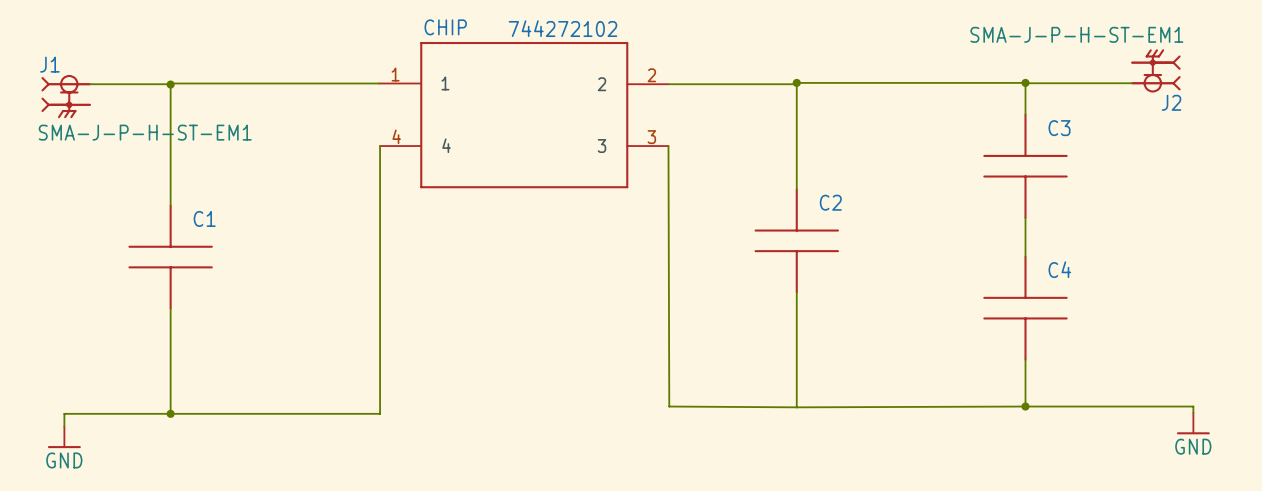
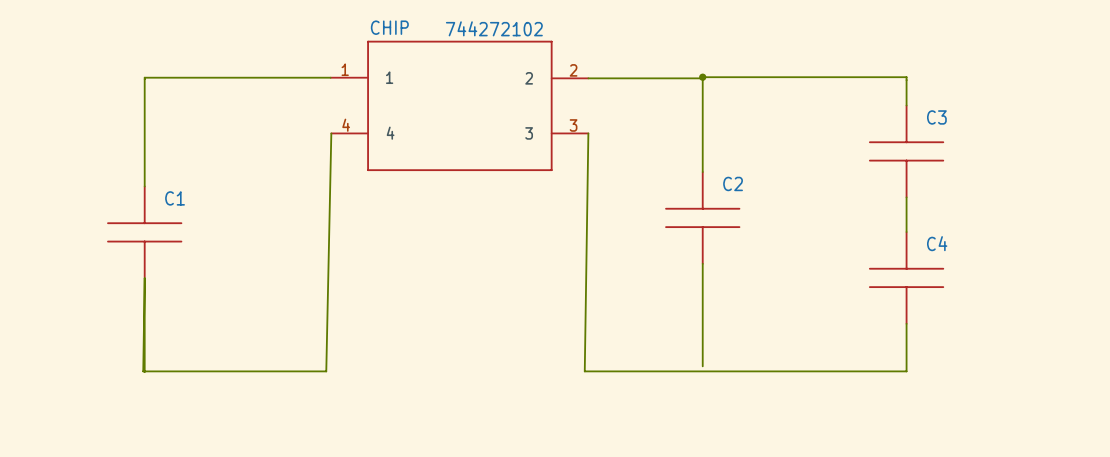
J2: SMA-J-P-H-ST-EM1 (1155, 70) -> none
wire: (1025, 82) (1132, 83) -> none
junction: (1025, 82) -> none
wire: (89, 84) (170, 84) -> none
junction: (170, 84) -> none
J1: SMA-J-P-H-ST-EM1 (66, 96) -> none
wire: (380, 146) (380, 413) (64, 413) (64, 426) -> (331, 133) (326, 371) (143, 371) (144, 278)
wire: (668, 146) (669, 406) (1193, 406) (1193, 412) -> (588, 133) (584, 371) (906, 371) (906, 365)
junction: (1025, 406) -> none
junction: (170, 413) -> none
power symbol: GND (1193, 423) -> none
power symbol: GND (64, 437) -> none

